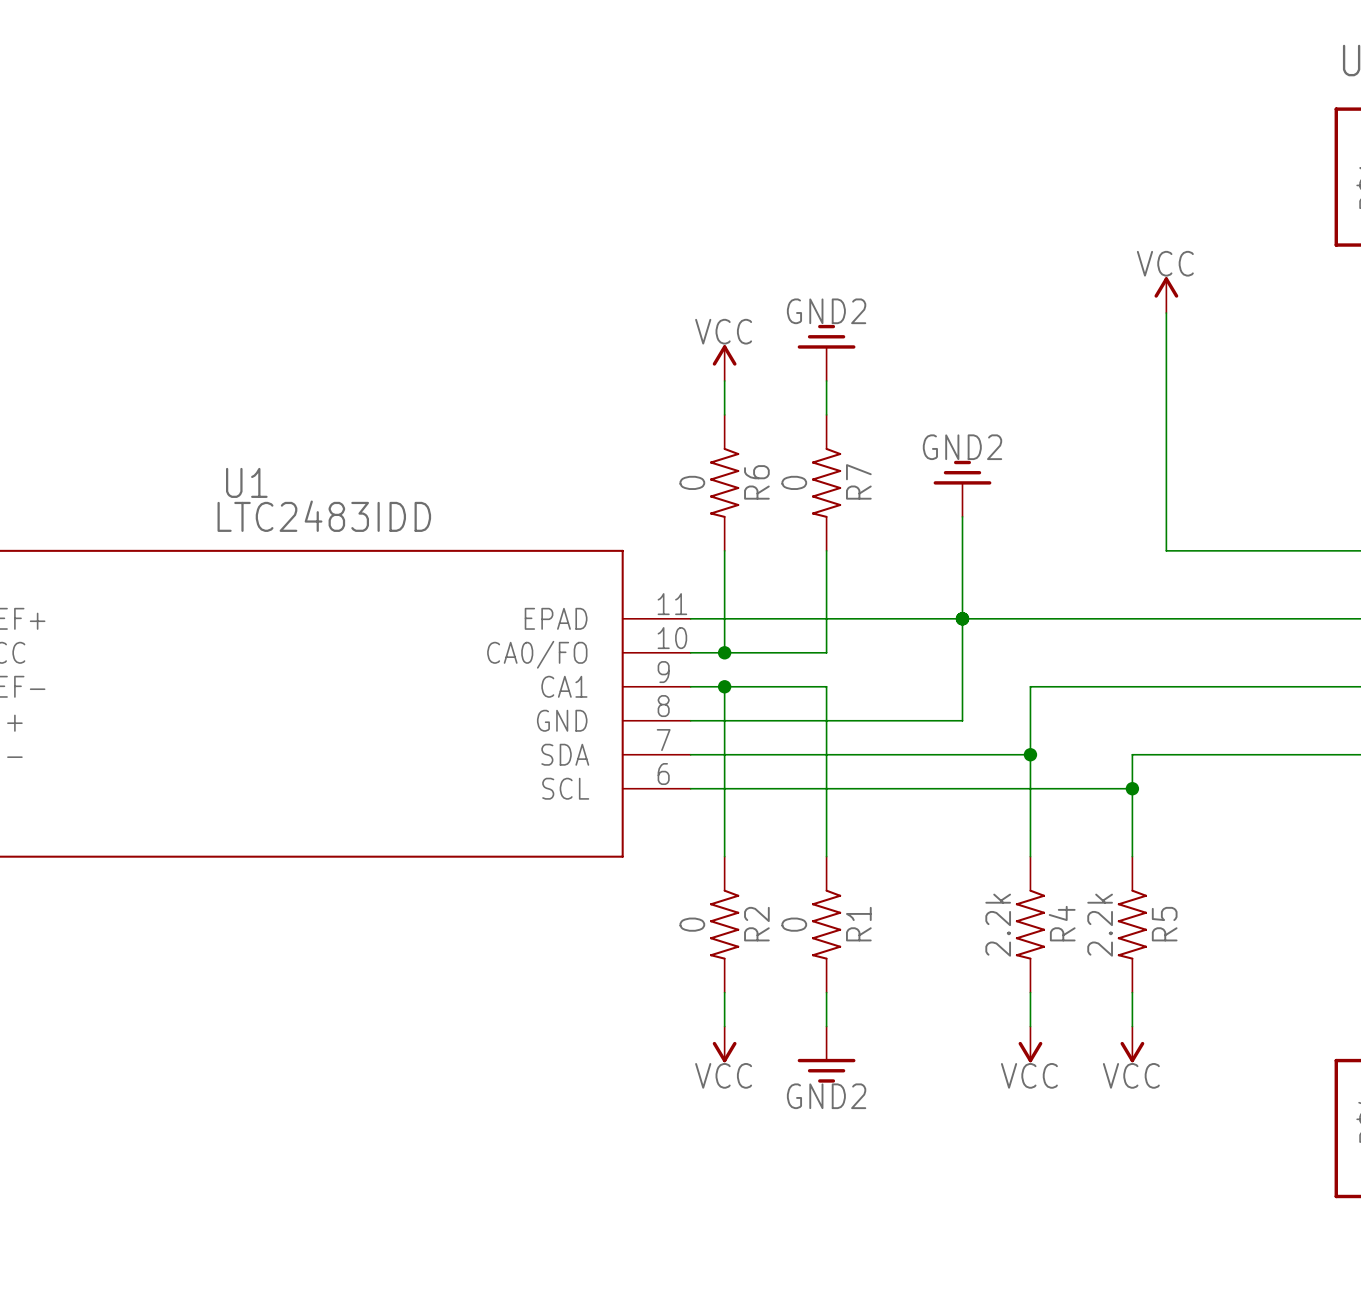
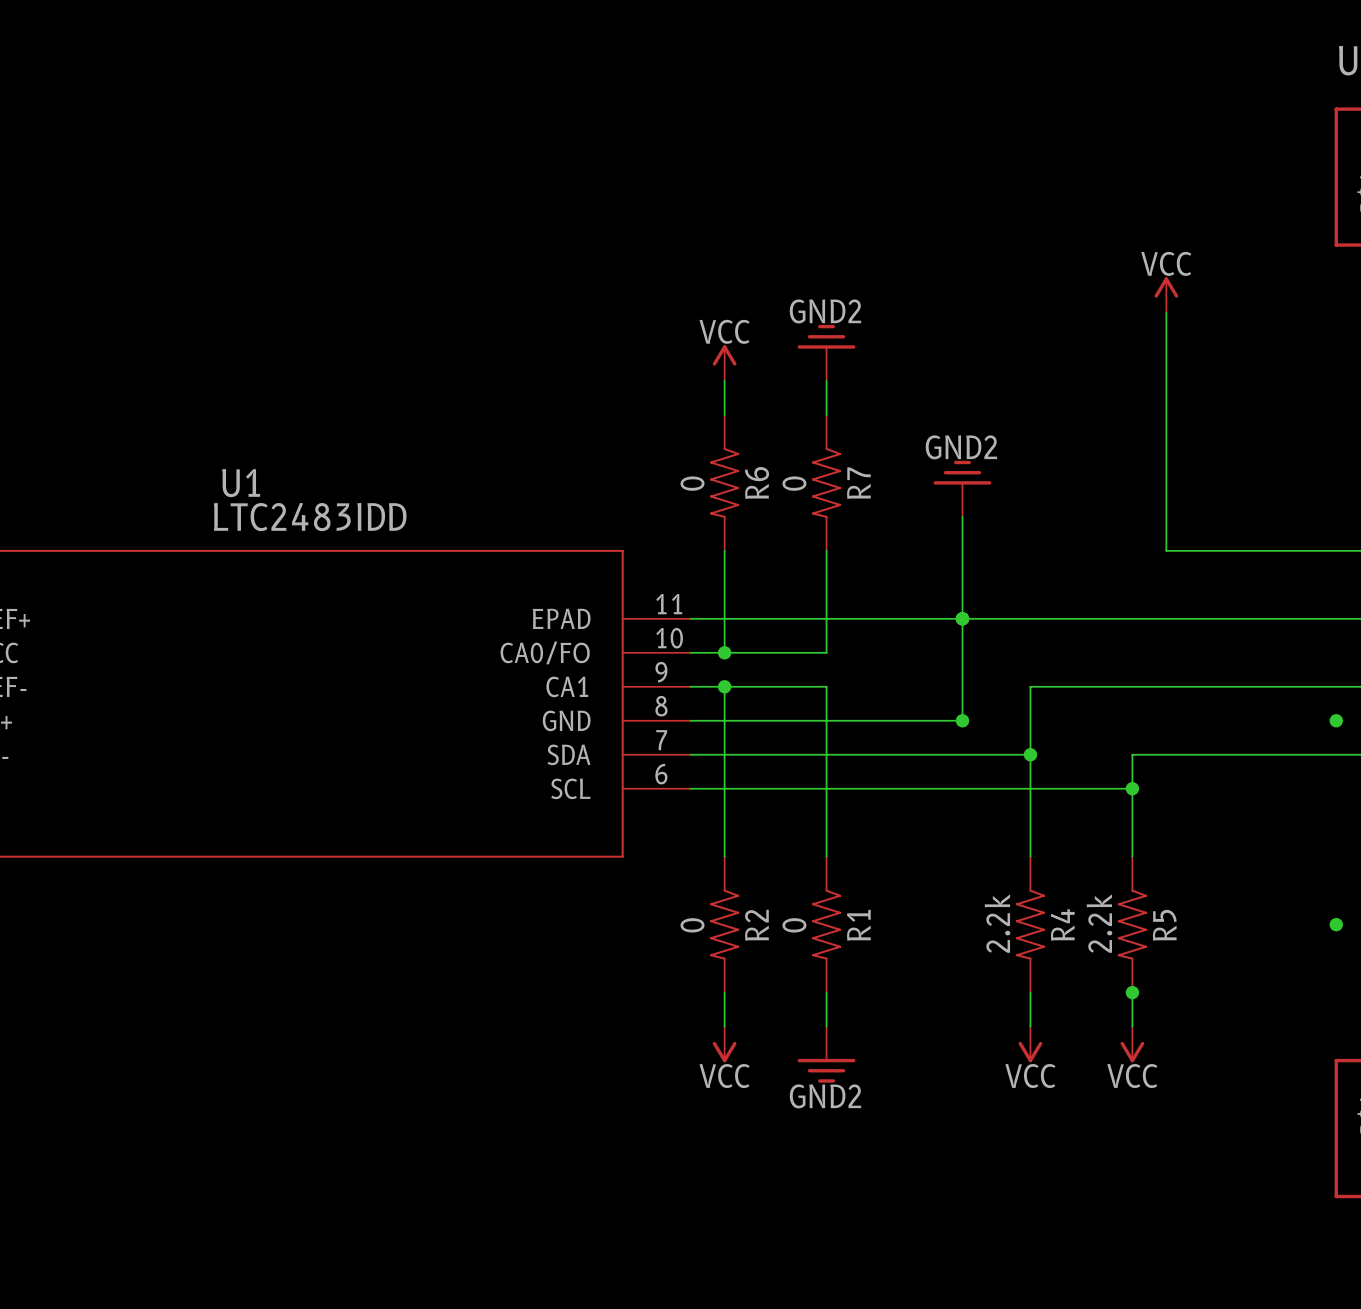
junction: none -> (962, 720)
junction: none -> (1336, 720)
junction: none -> (1336, 924)
junction: none -> (1132, 992)

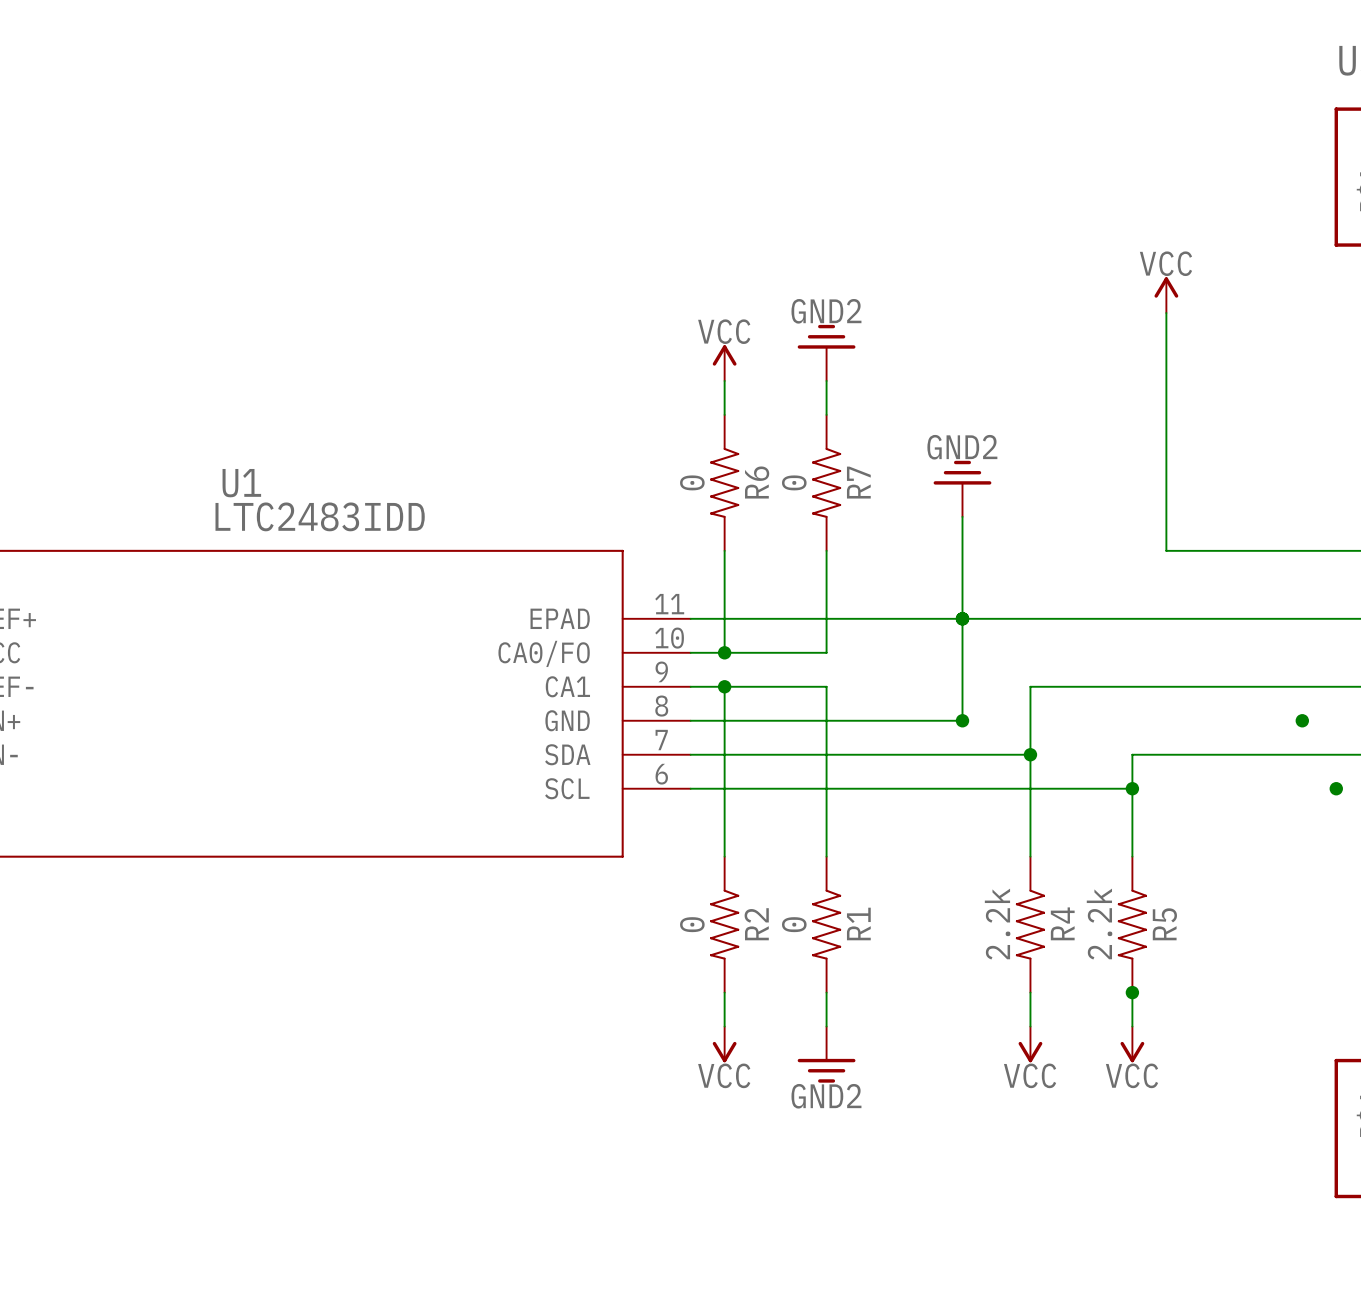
junction: none -> (1302, 720)
junction: (1336, 720) -> none
junction: none -> (1336, 788)
junction: (1336, 924) -> none

